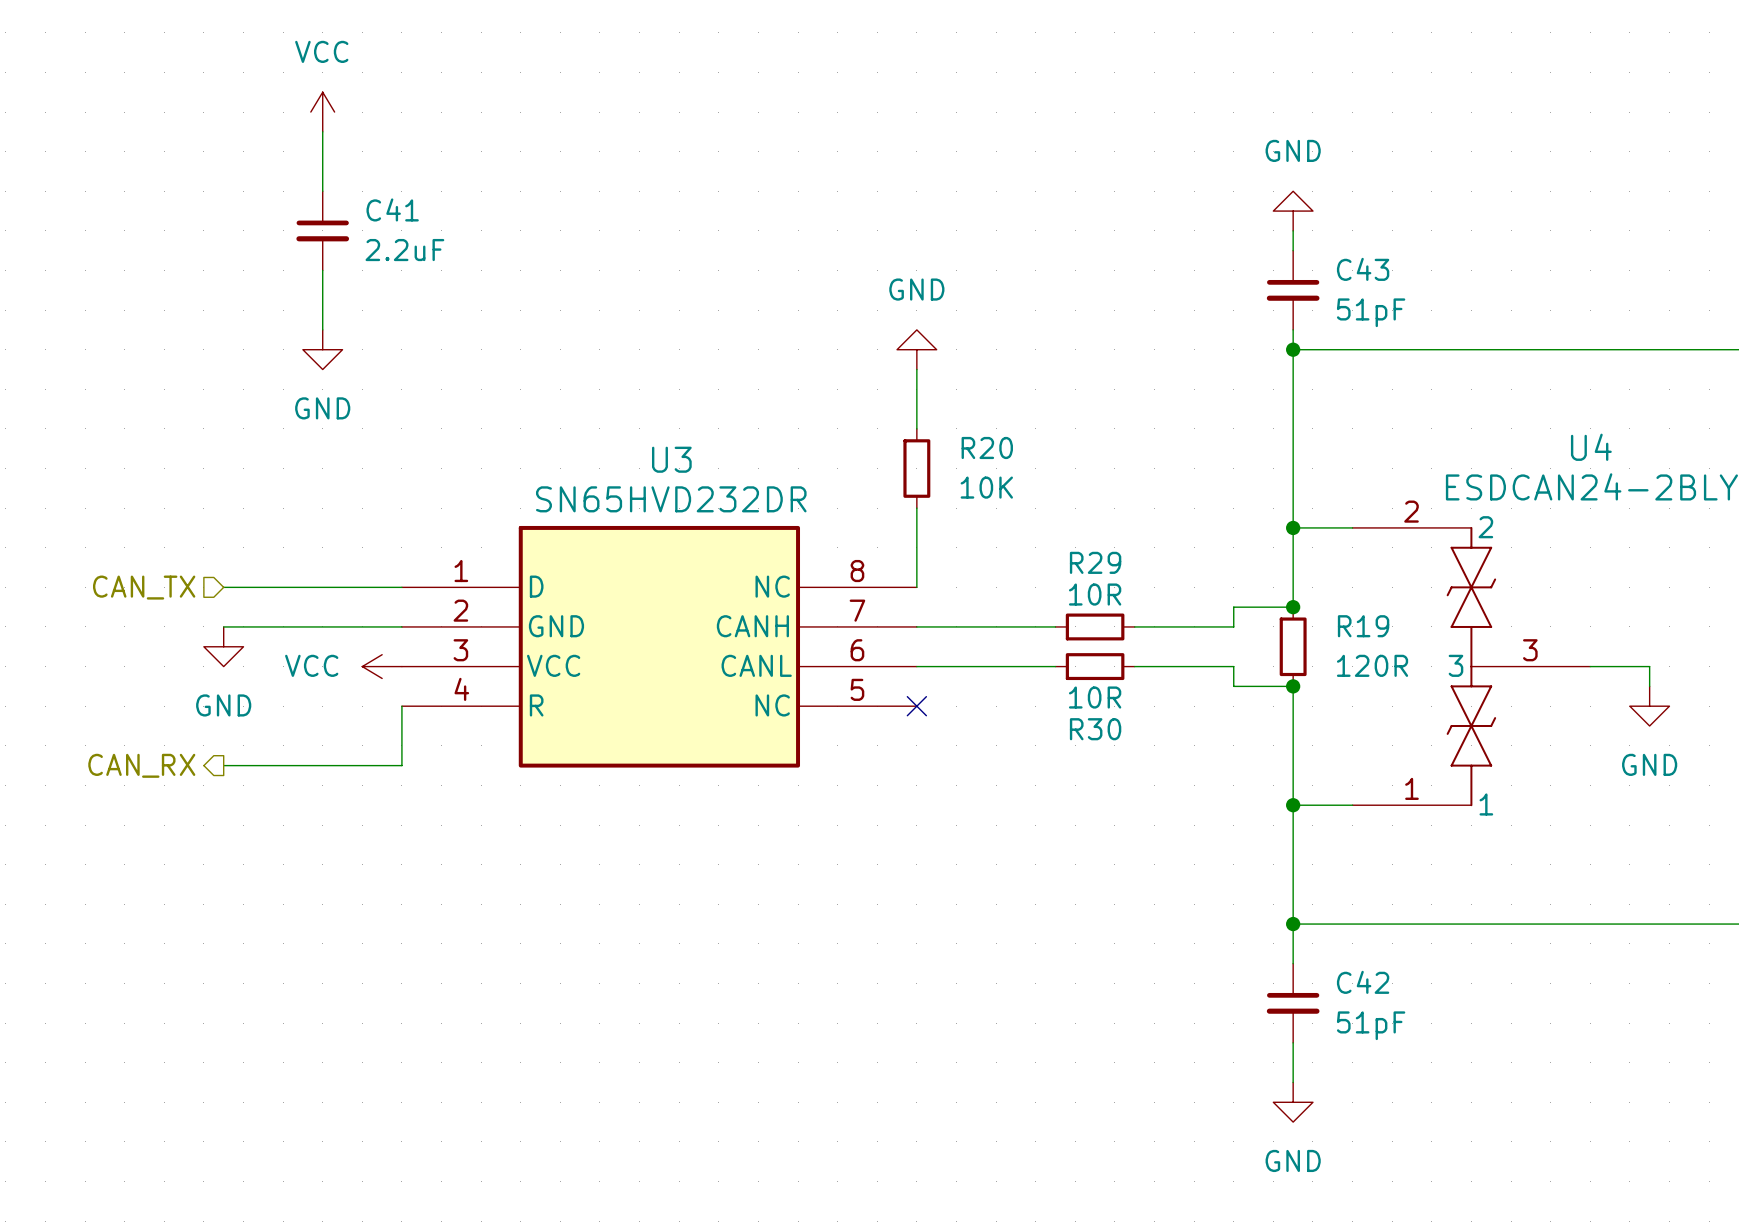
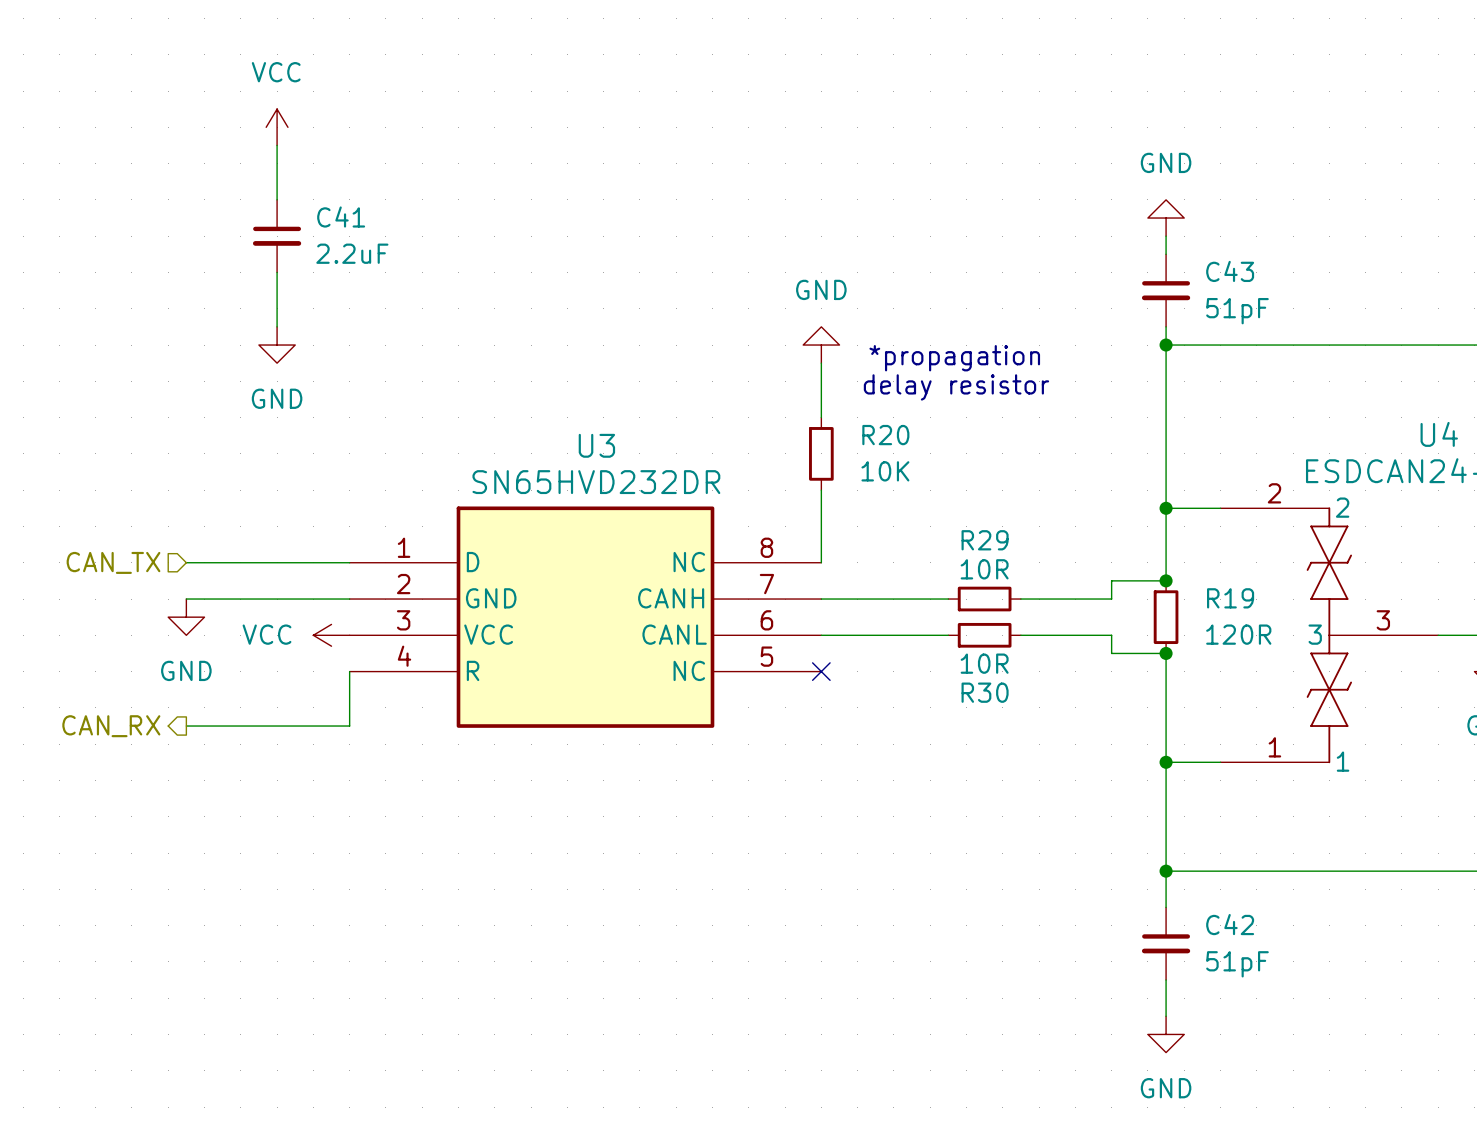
text: none -> *propagation (954, 358)
text: none -> delay resistor (956, 387)

